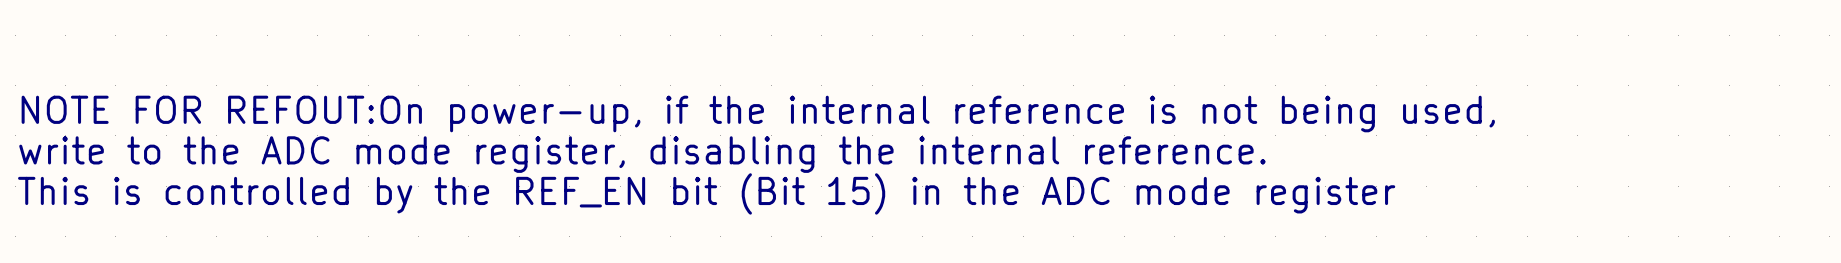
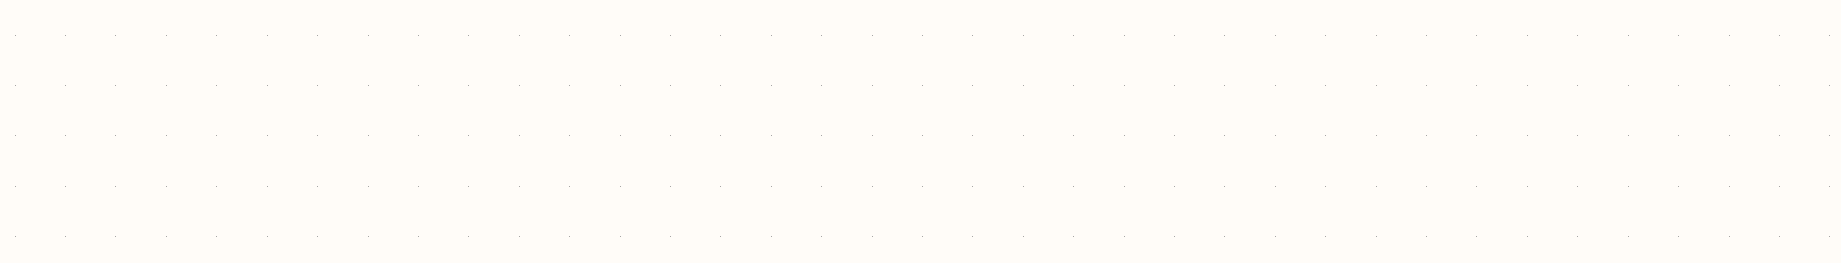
text: NOTE FOR REFOUT:On power-up, if the internal reference is not being used, (758, 113) -> none
text: write to the ADC mode register, disabling the internal reference. (642, 154) -> none
text: This is controlled by the REF_EN bit (Bit 15) in the ADC mode register (706, 193) -> none

